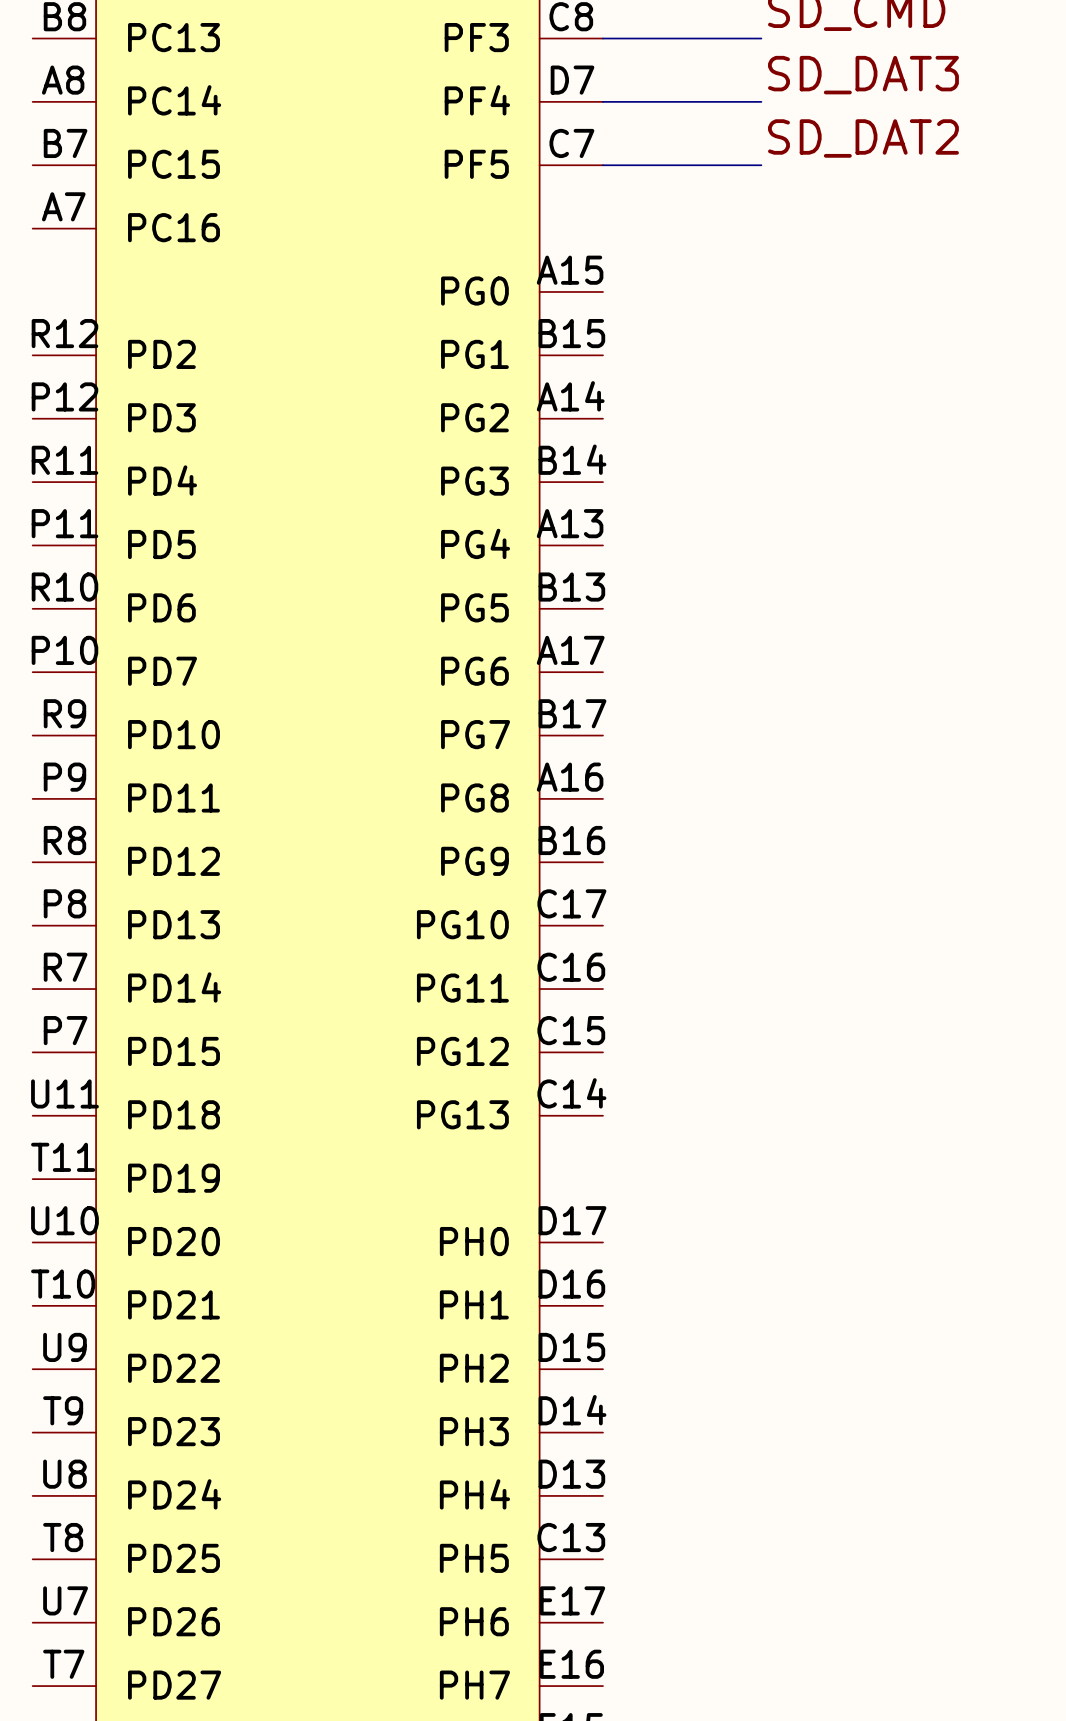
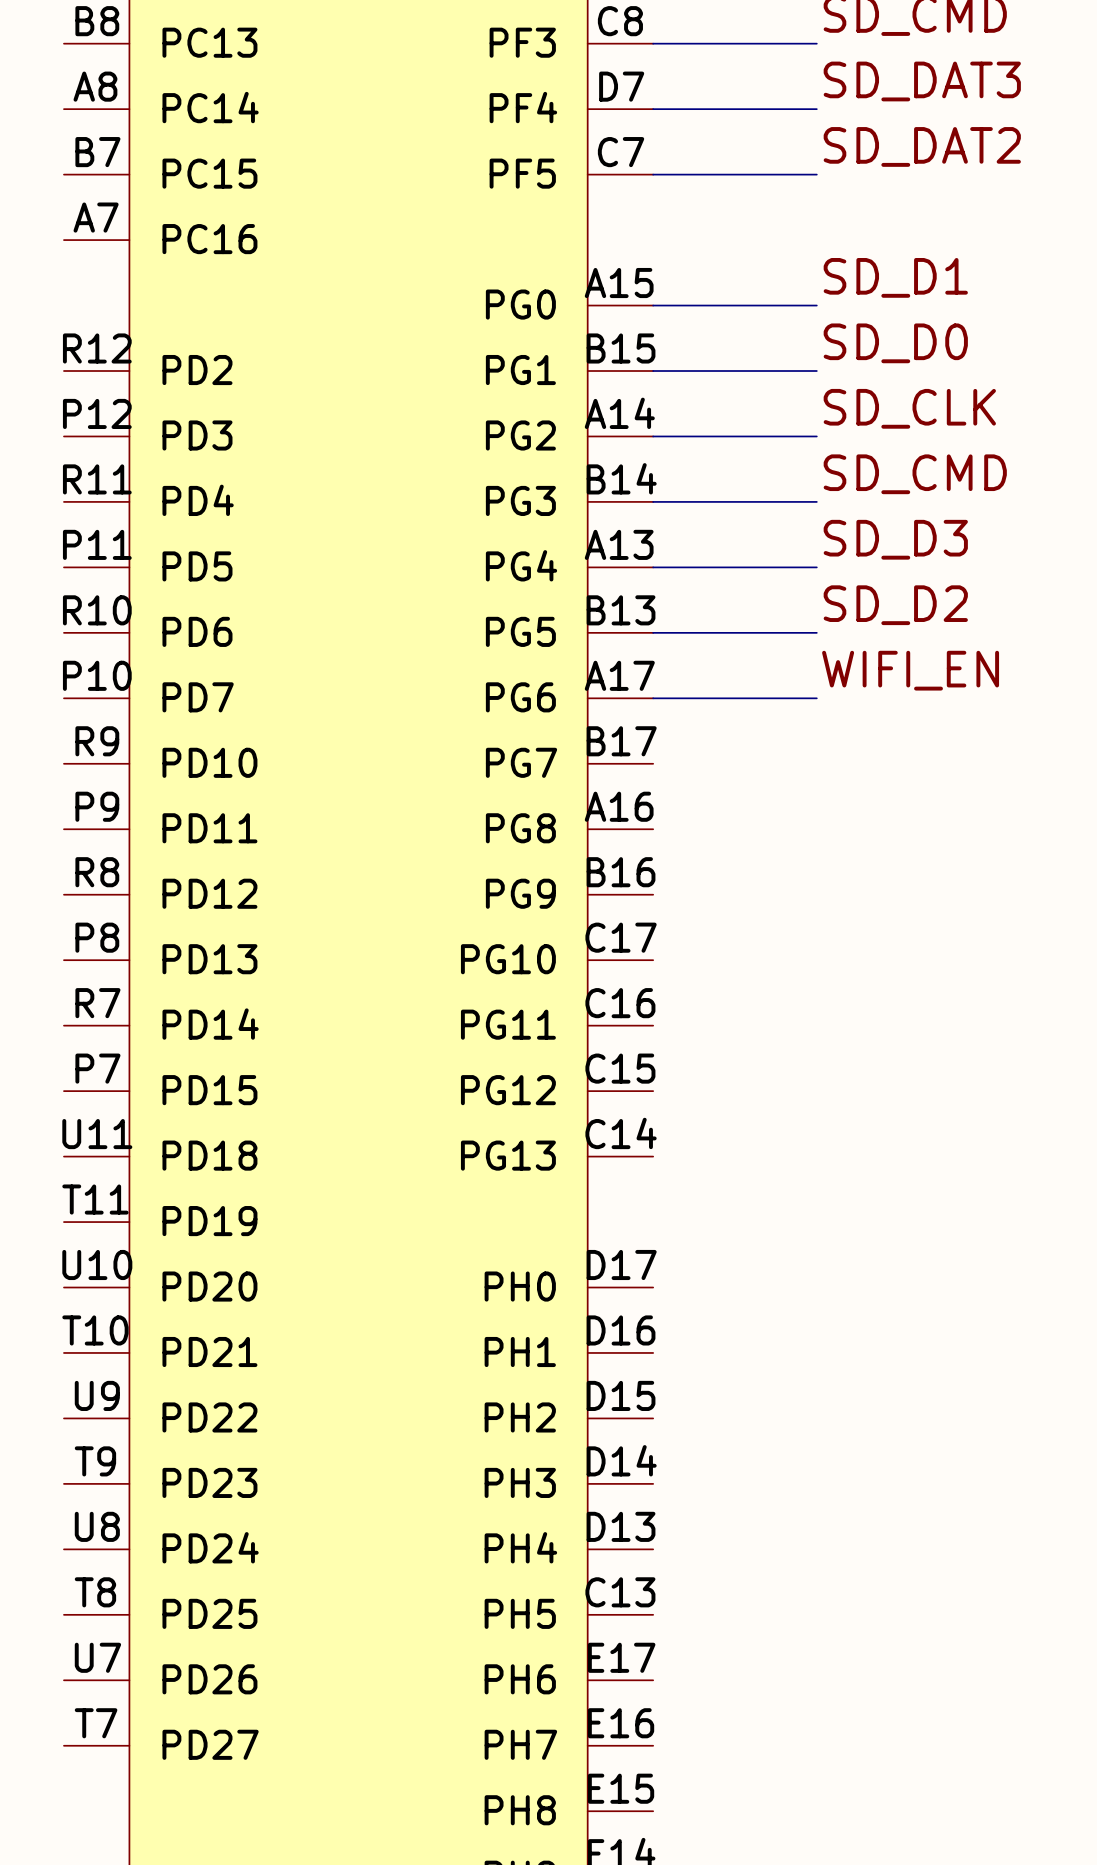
label: none -> SD_D1 (895, 277)
wire: none -> (653, 305) (816, 305)
label: none -> SD_D0 (895, 343)
wire: none -> (653, 371) (816, 371)
label: none -> SD_CLK (909, 408)
wire: none -> (653, 436) (816, 436)
label: none -> SD_CMD (915, 474)
wire: none -> (653, 501) (816, 501)
label: none -> SD_D3 (895, 539)
wire: none -> (653, 567) (816, 567)
label: none -> SD_D2 (895, 605)
wire: none -> (653, 632) (816, 632)
label: none -> WIFI_EN (910, 670)
wire: none -> (653, 698) (816, 698)

